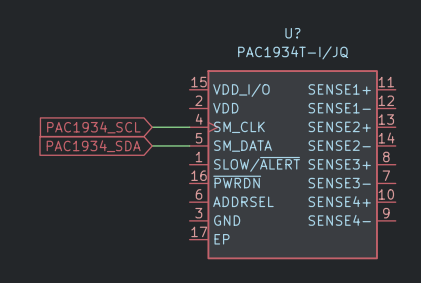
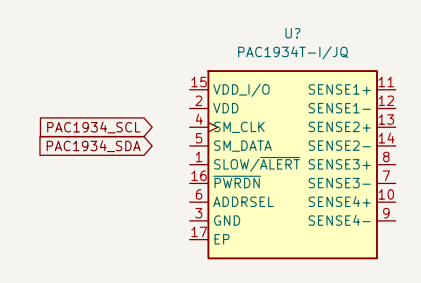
wire: (152, 127) (189, 127) -> none
wire: (152, 145) (189, 145) -> none

